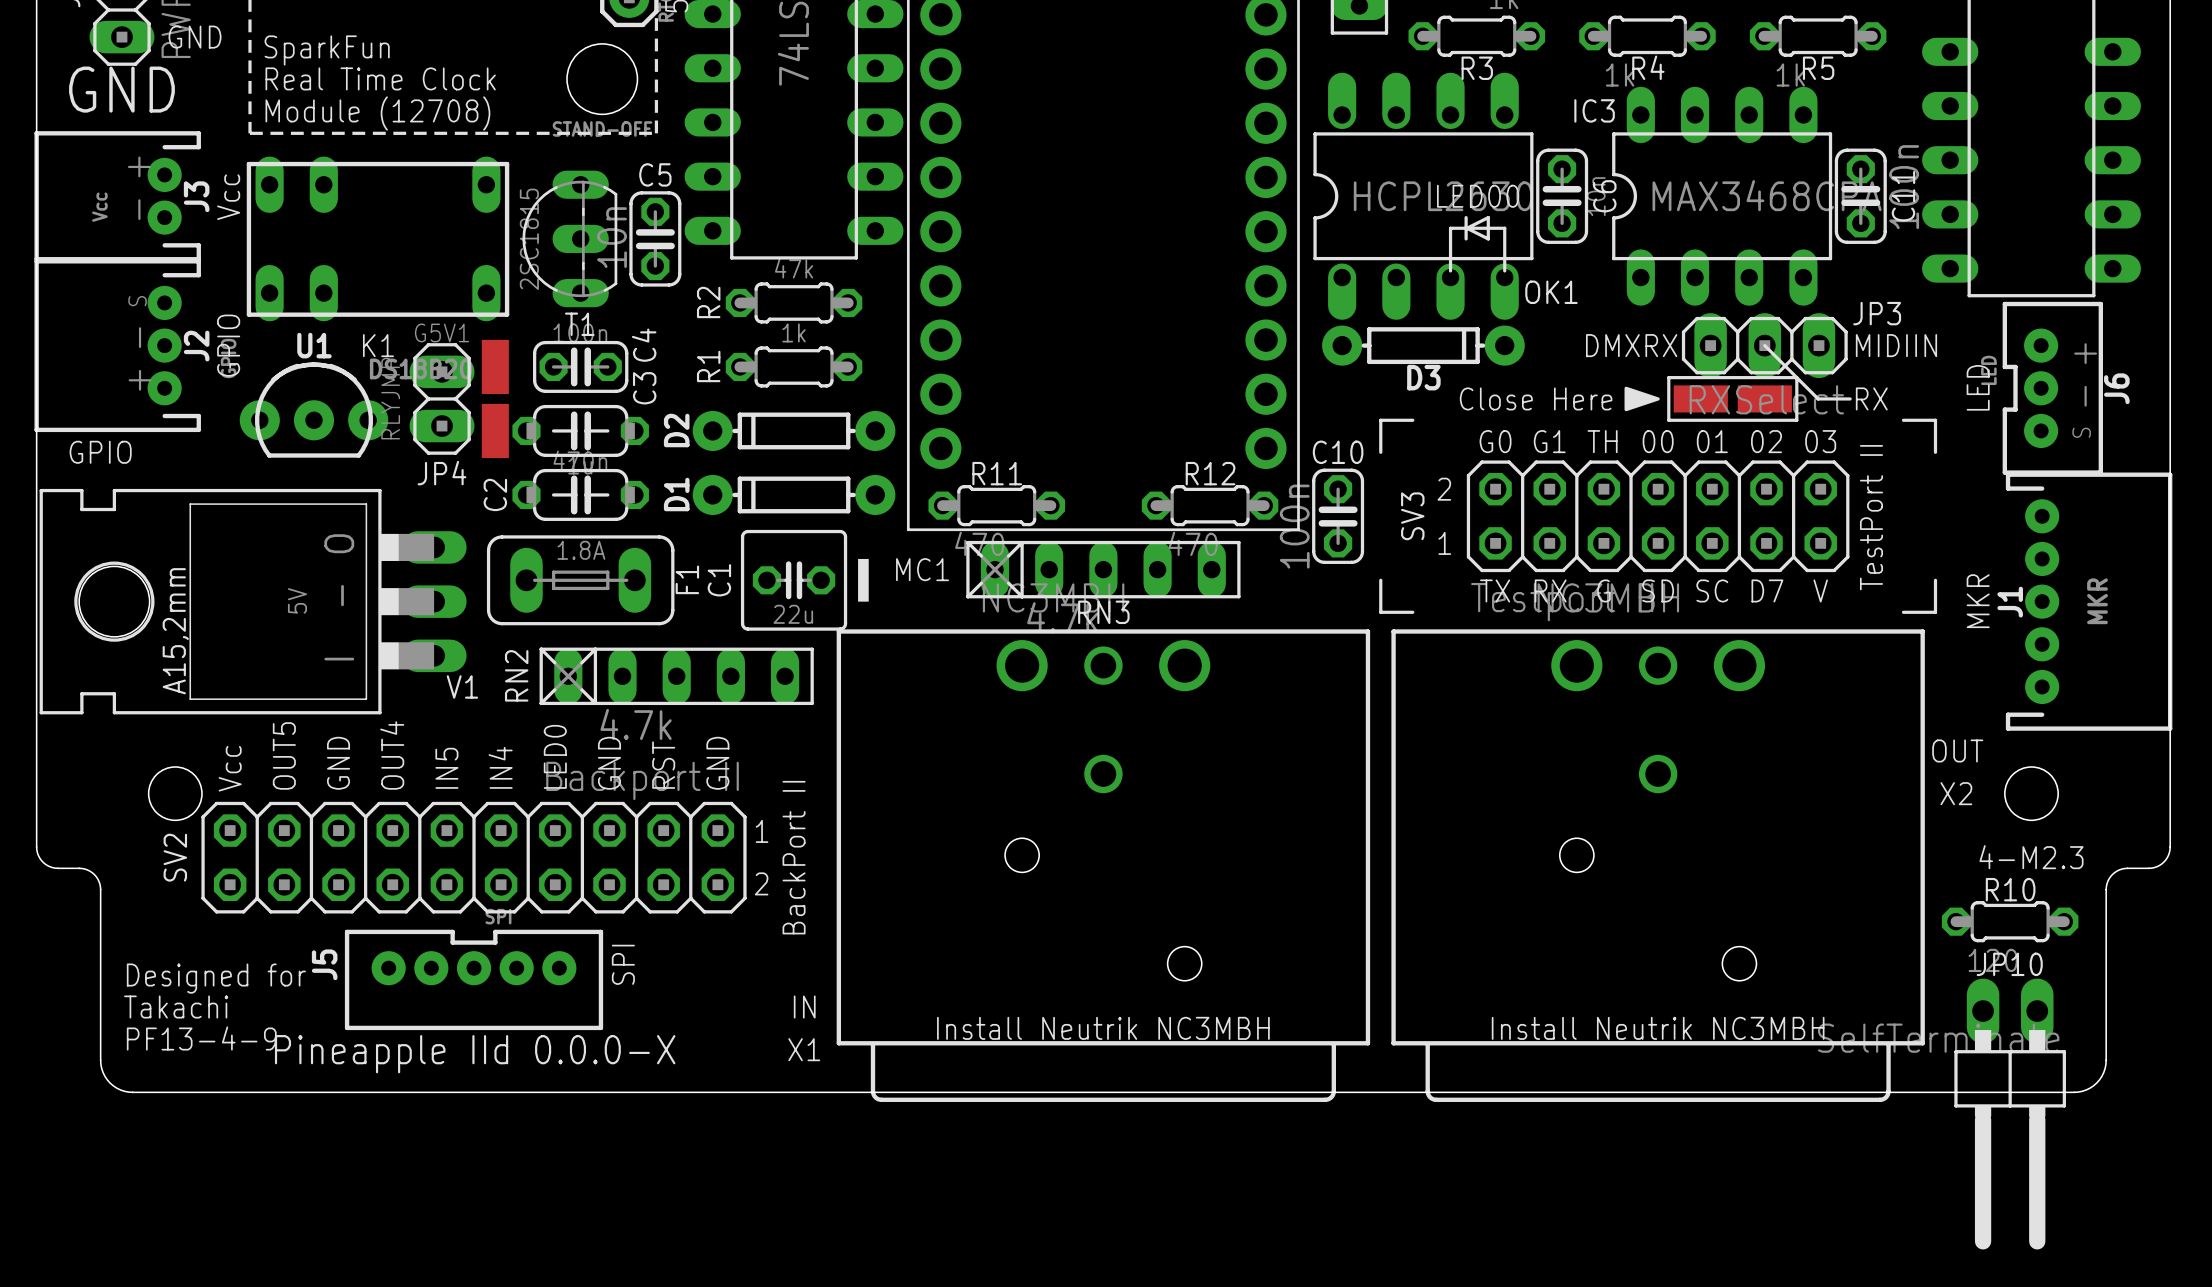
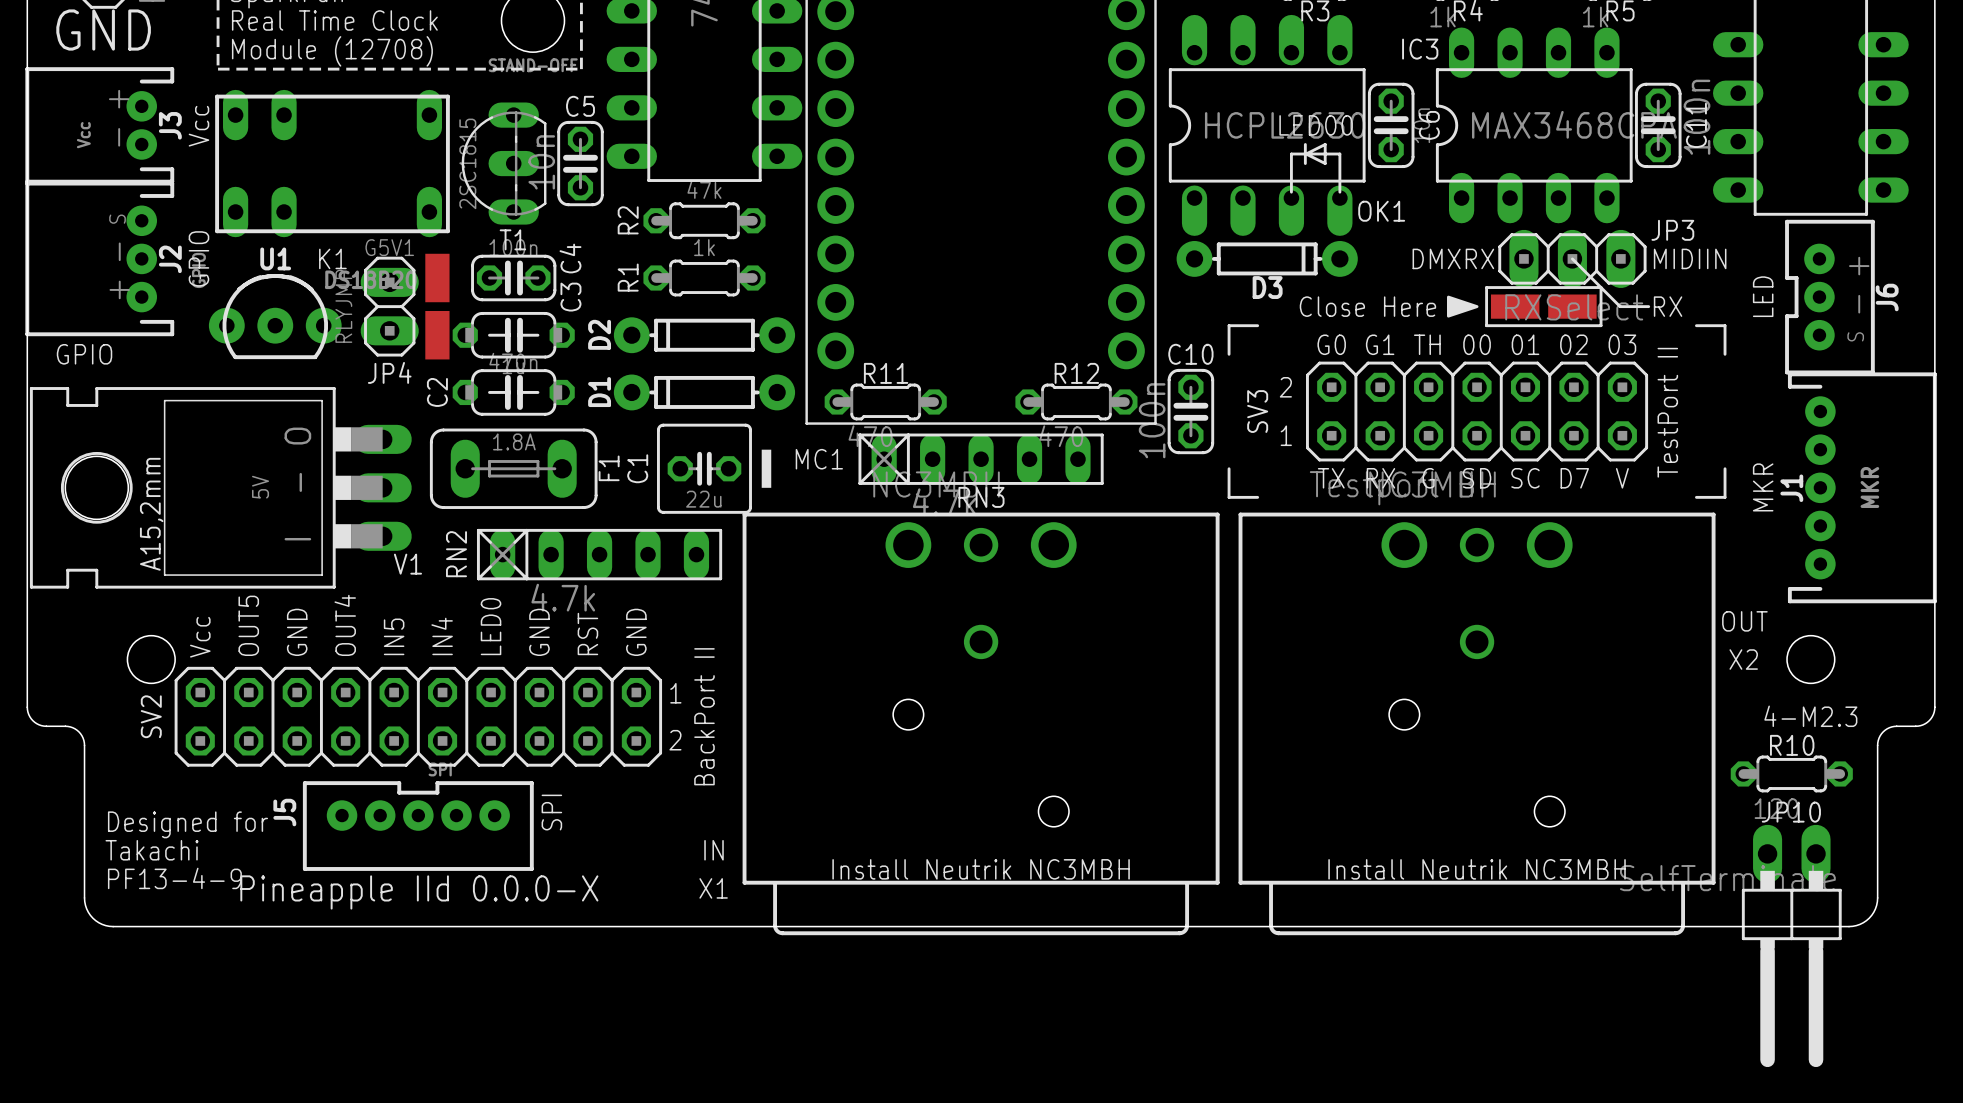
J6 value: LED (1988, 370) -> none
SV2 value: Backport II (642, 780) -> none

